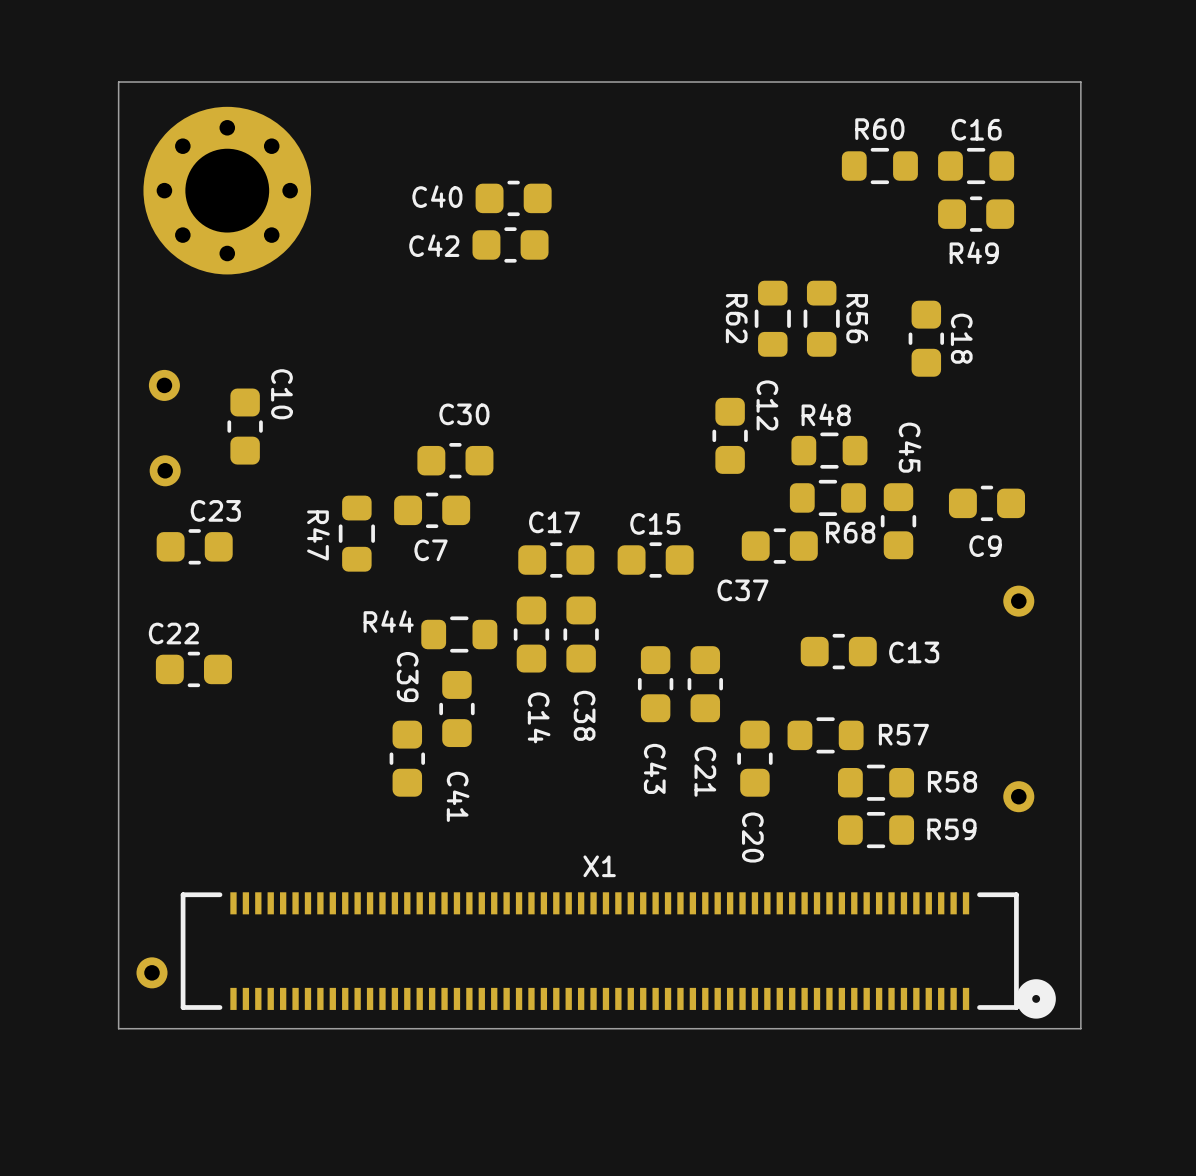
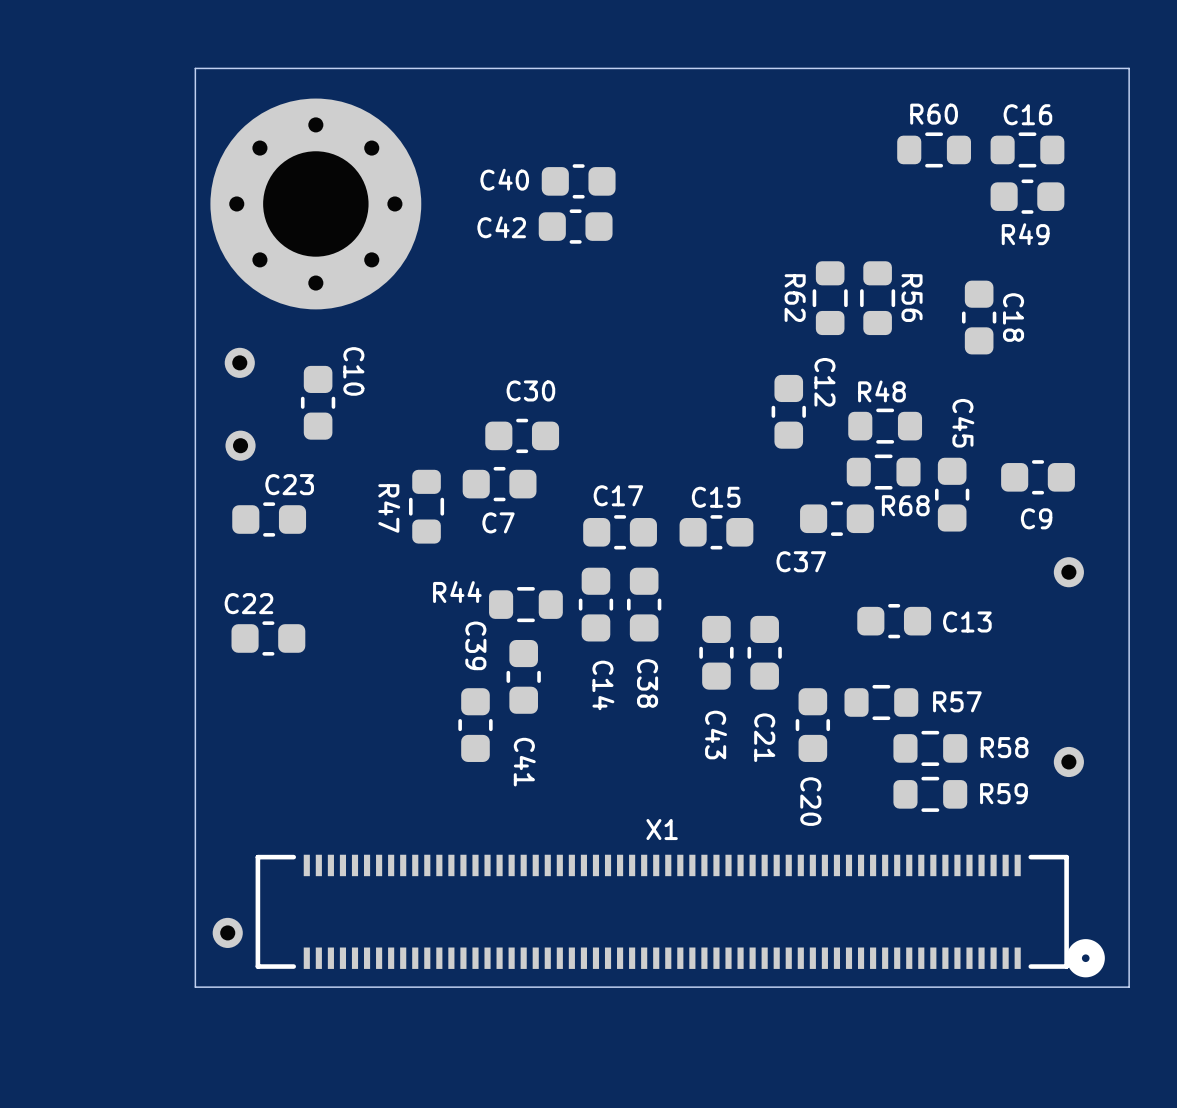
part: (227, 190) -> none
part: none -> (315, 203)

